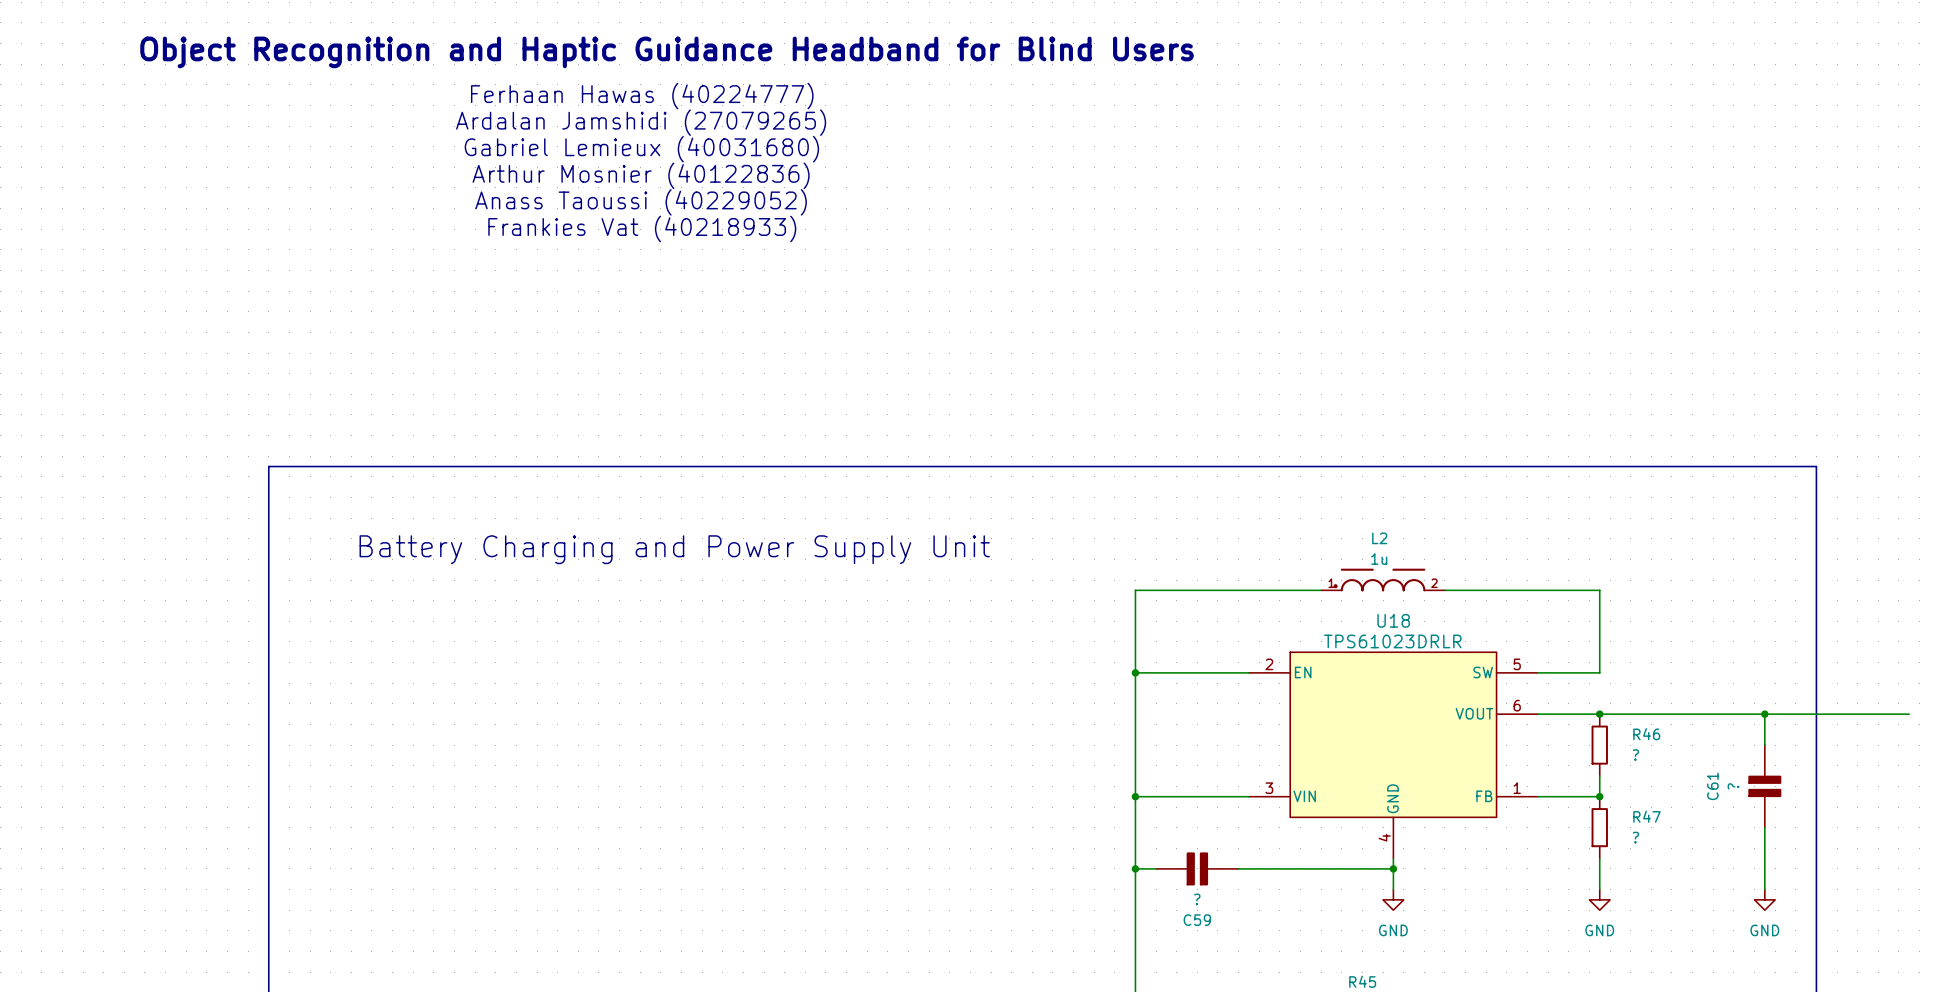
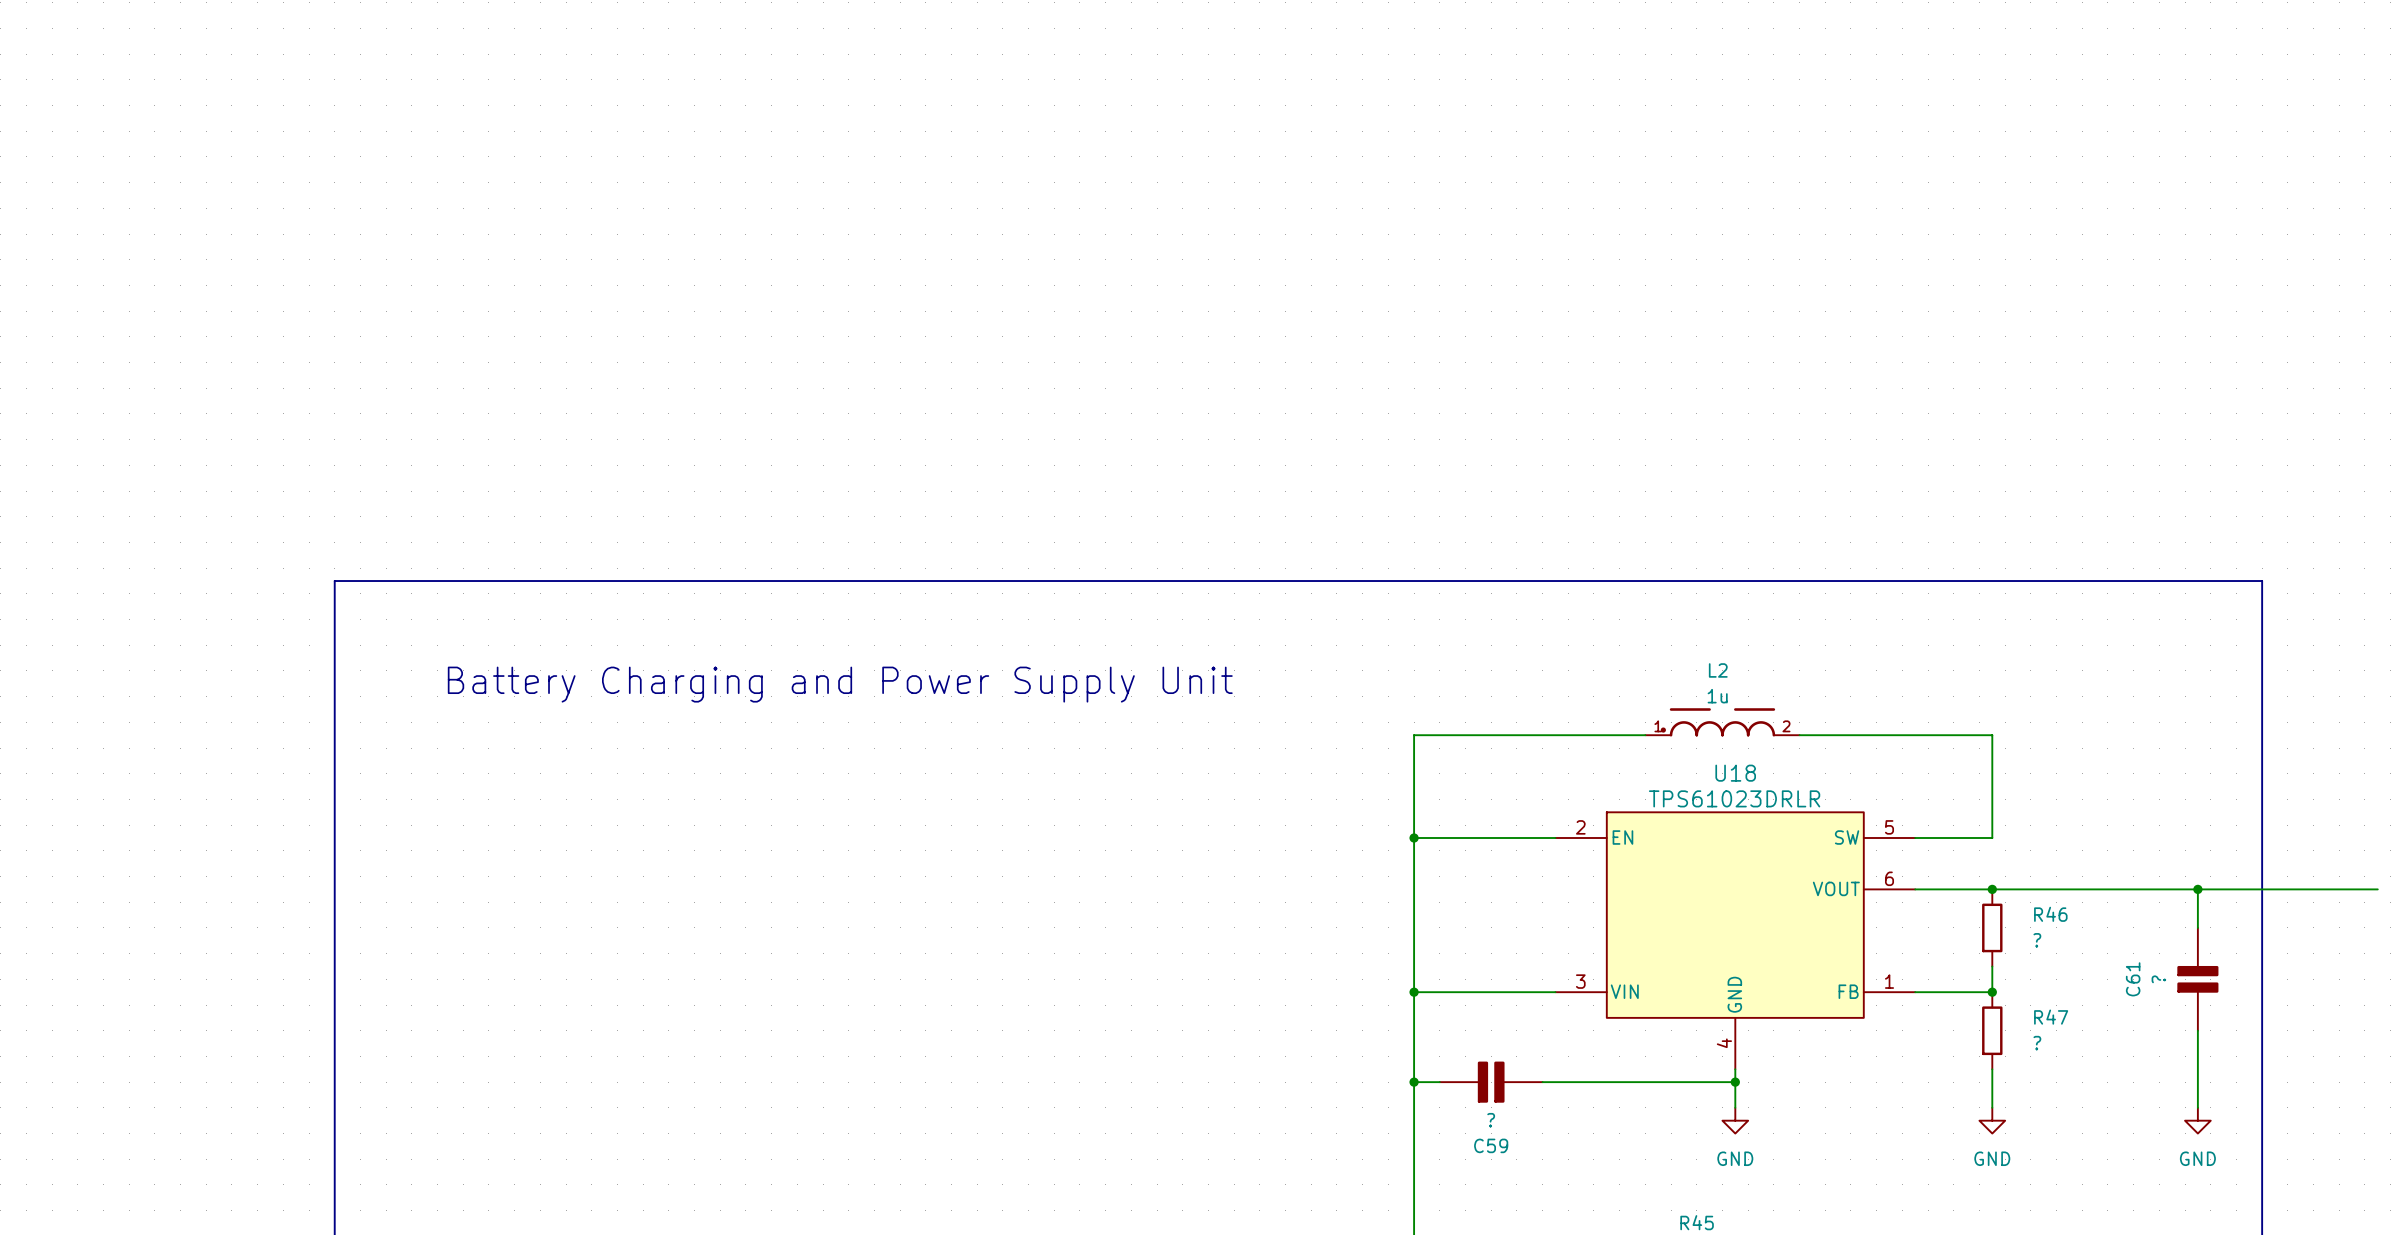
text: Object Recognition and Haptic Guidance Headband for Blind Users (667, 52) -> none
text: Ferhaan Hawas (40224777) (642, 96) -> none
text: Ardalan Jamshidi (27079265) (641, 122) -> none
text: Gabriel Lemieux (40031680) (641, 149) -> none
text: Arthur Mosnier (40122836) (641, 175) -> none
text: Anass Taoussi (40229052) (641, 202) -> none
text: Frankies Vat (40218933) (642, 228) -> none

